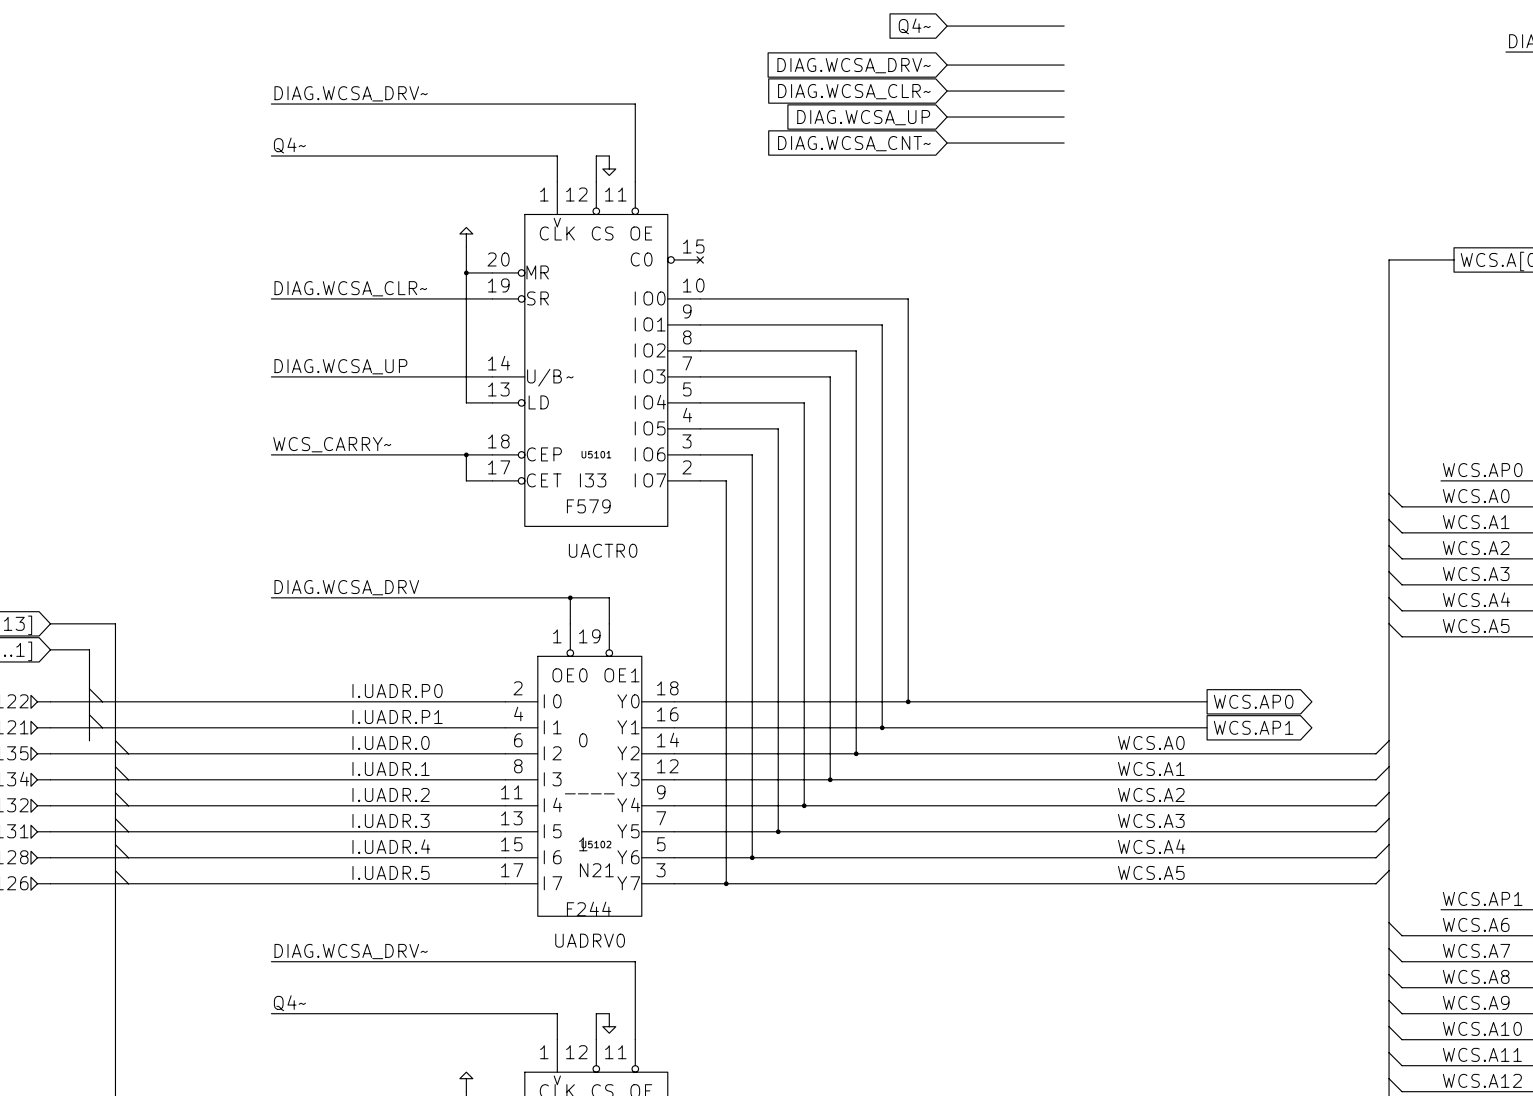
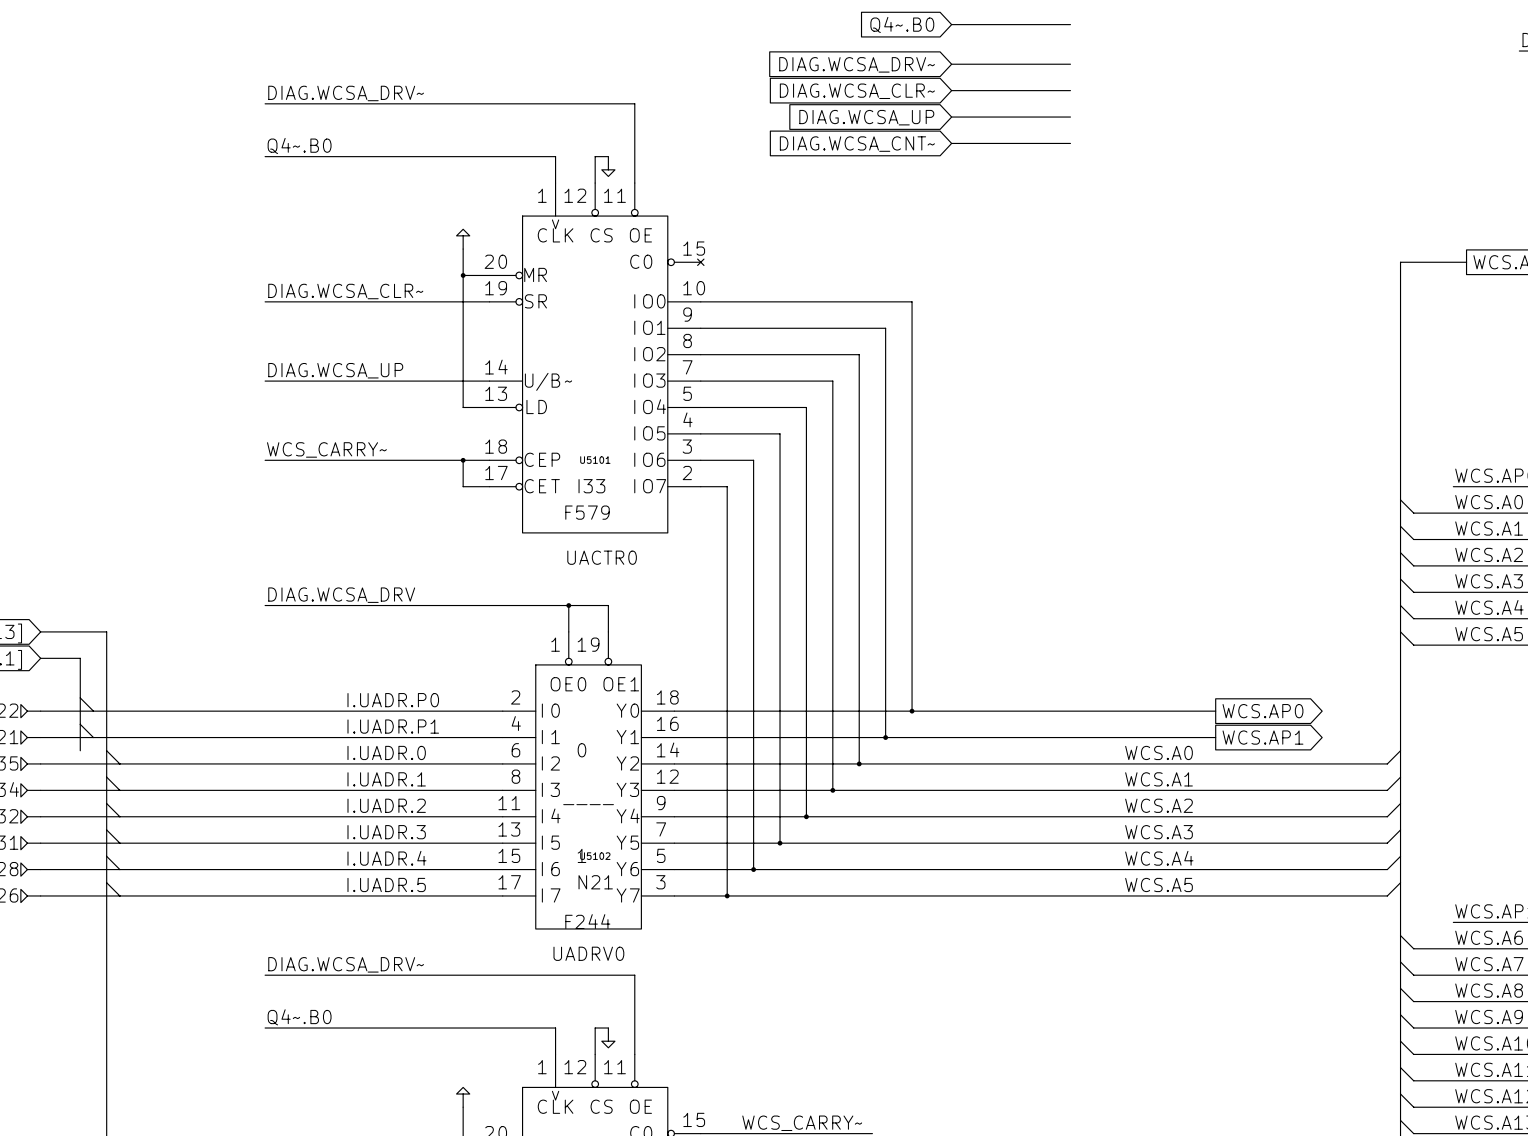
global label: Q4~ (914, 26) -> Q4~.B0 (902, 24)
label: Q4~ (289, 145) -> Q4~.B0 (299, 145)
label: Q4~ (289, 1003) -> Q4~.B0 (299, 1017)

